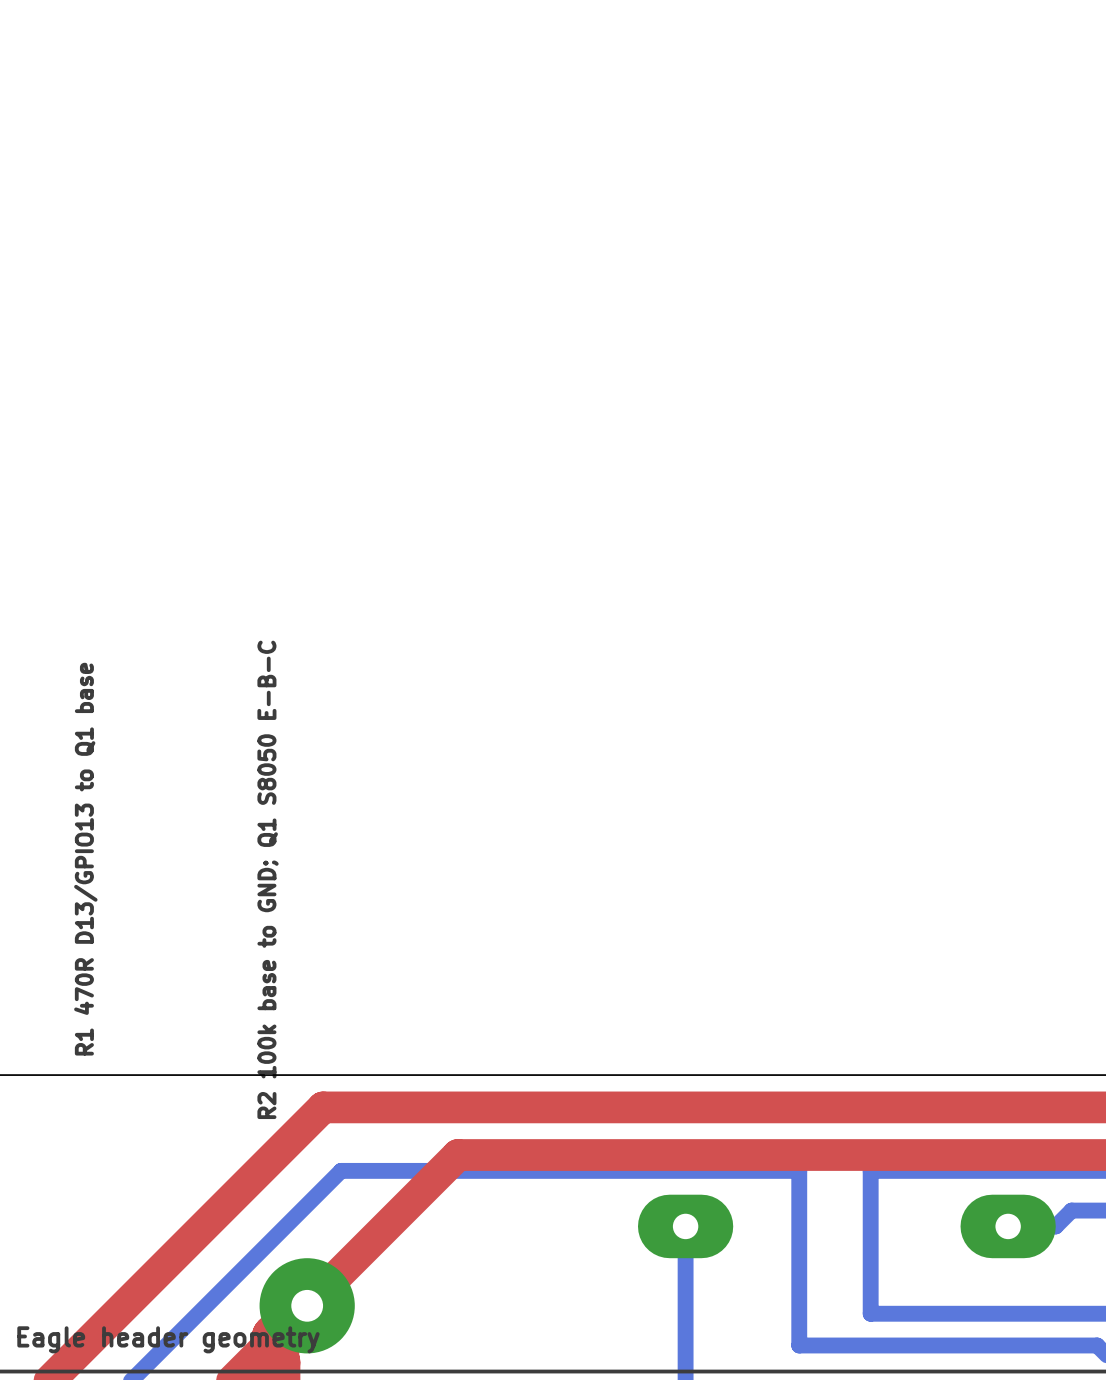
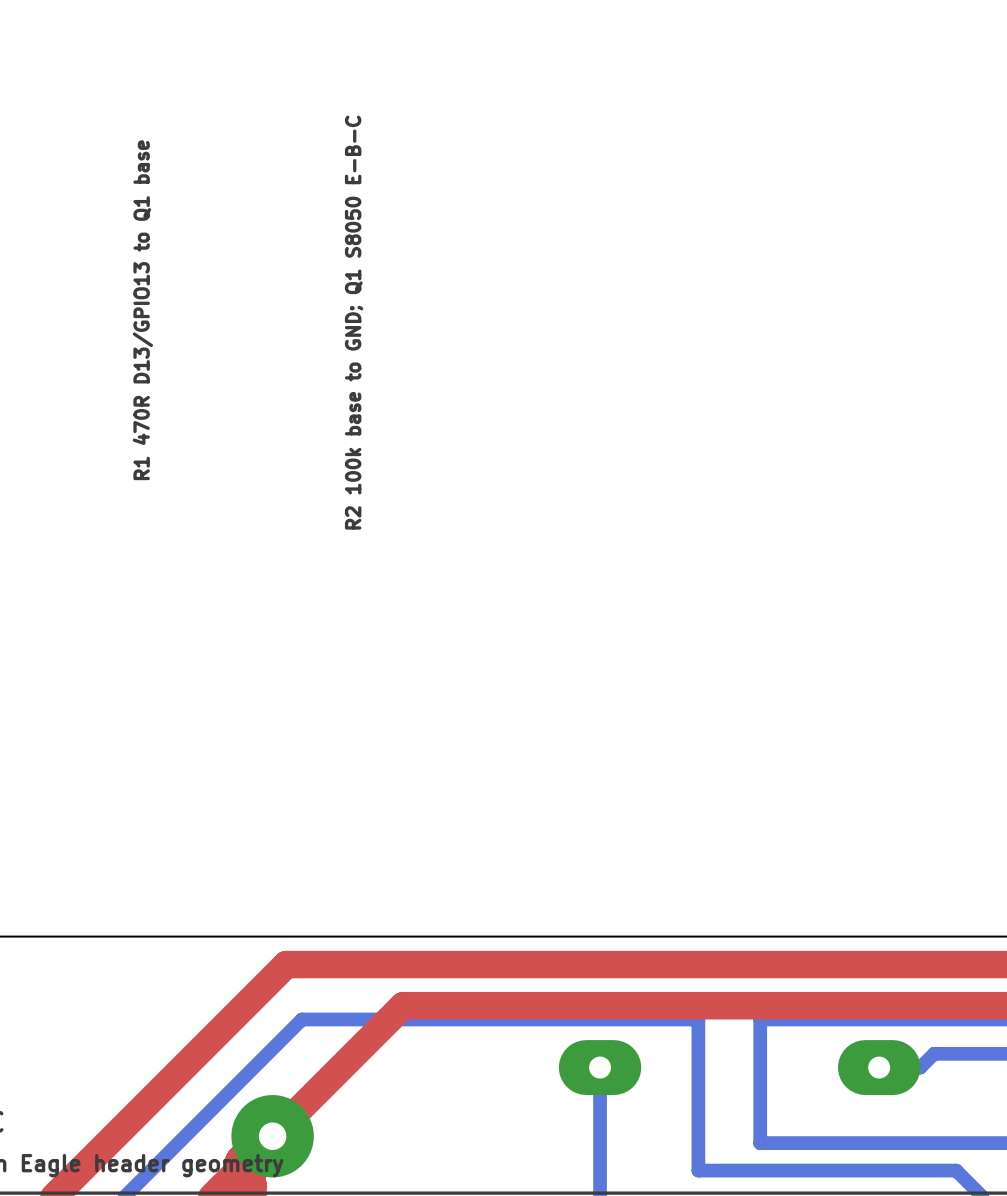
text position: R1 470R D13/GPIO13 to Q1 base (85, 859) -> R1 470R D13/GPIO13 to Q1 base (142, 310)
text position: R2 100k base to GND; Q1 S8050 E-B-C (268, 879) -> R2 100k base to GND; Q1 S8050 E-B-C (354, 322)

